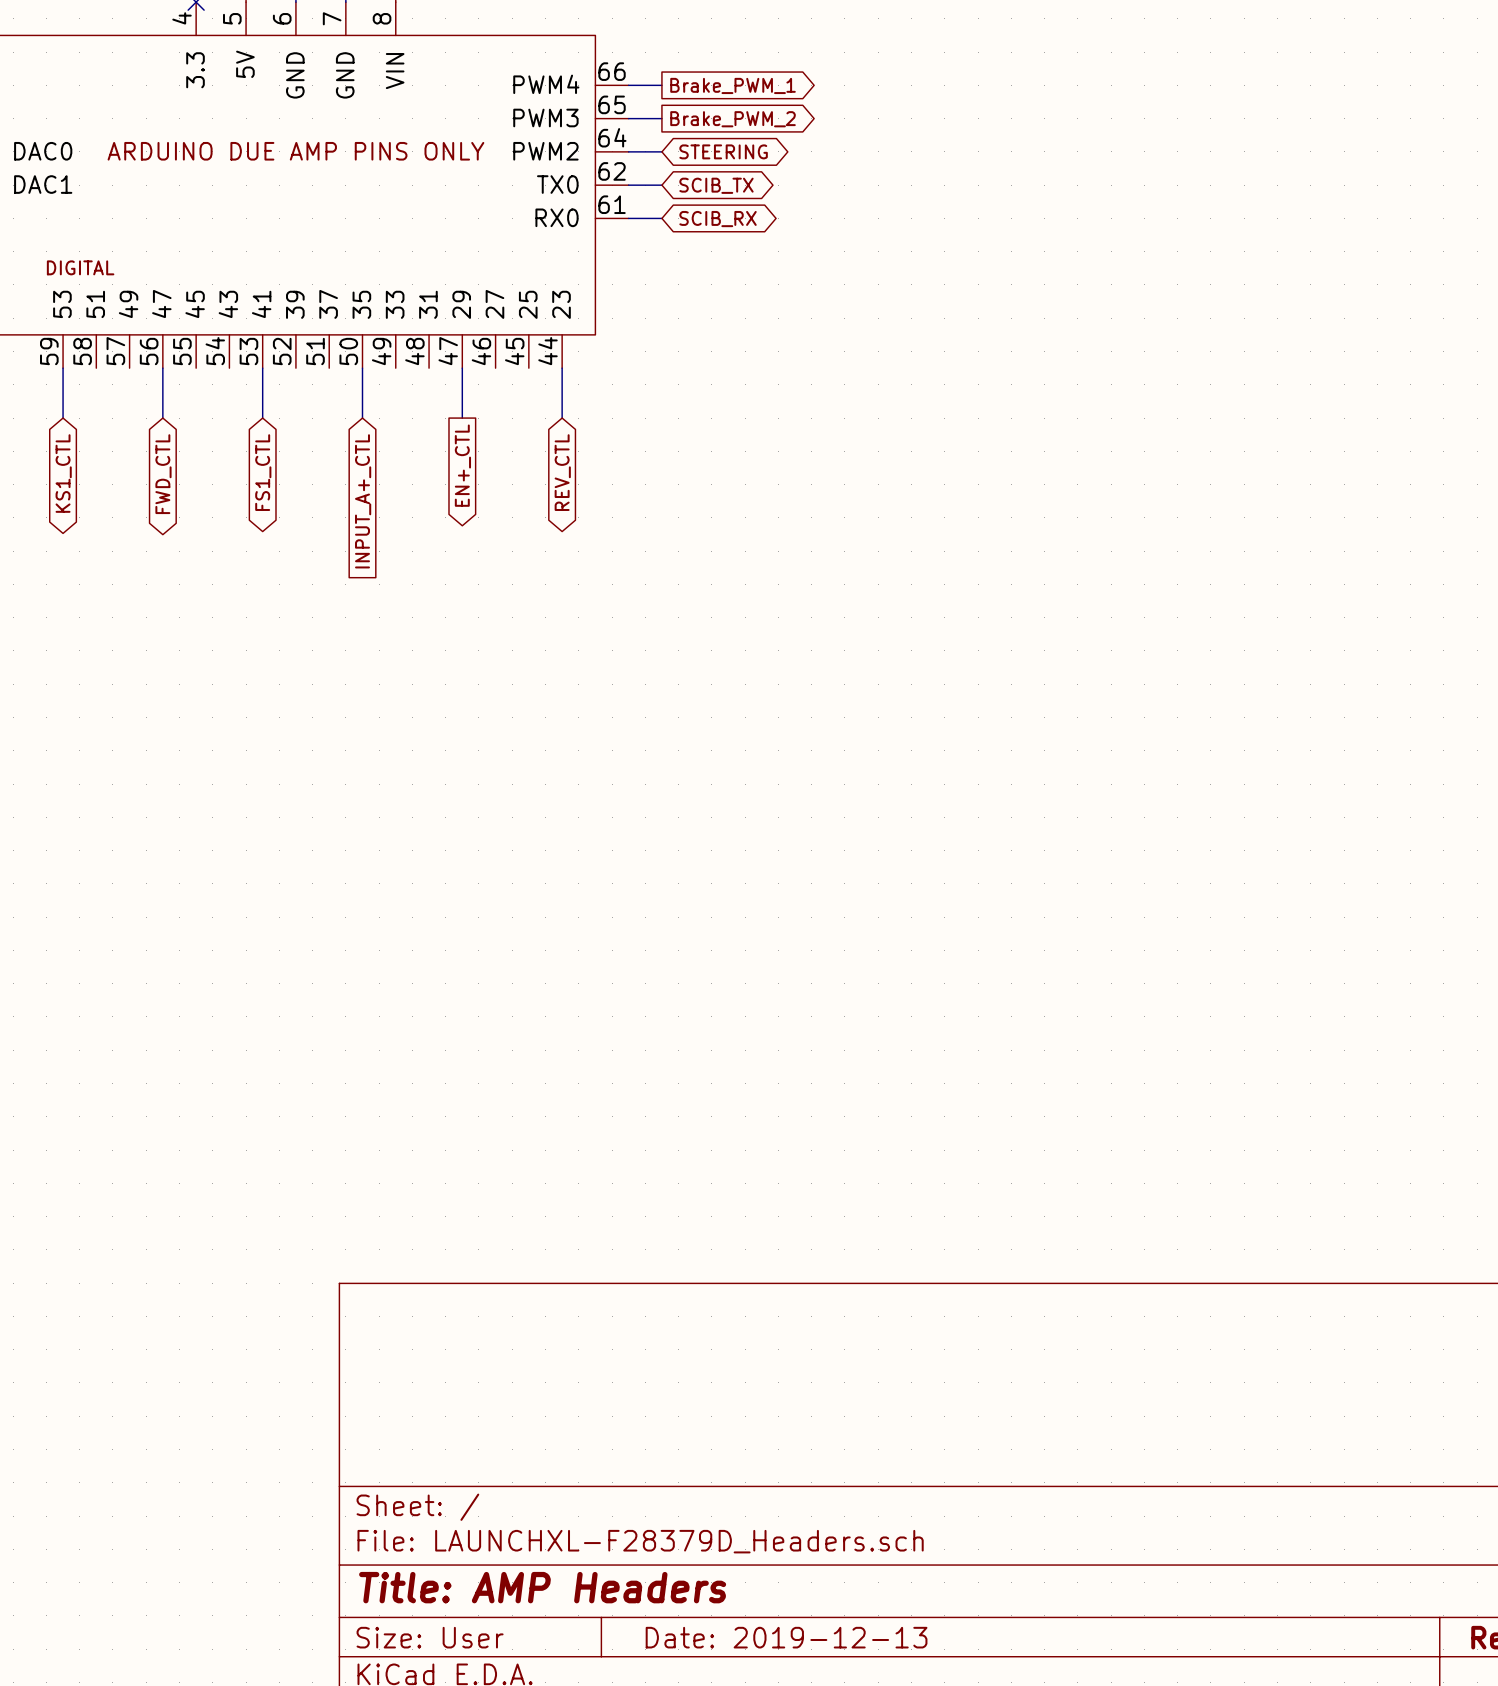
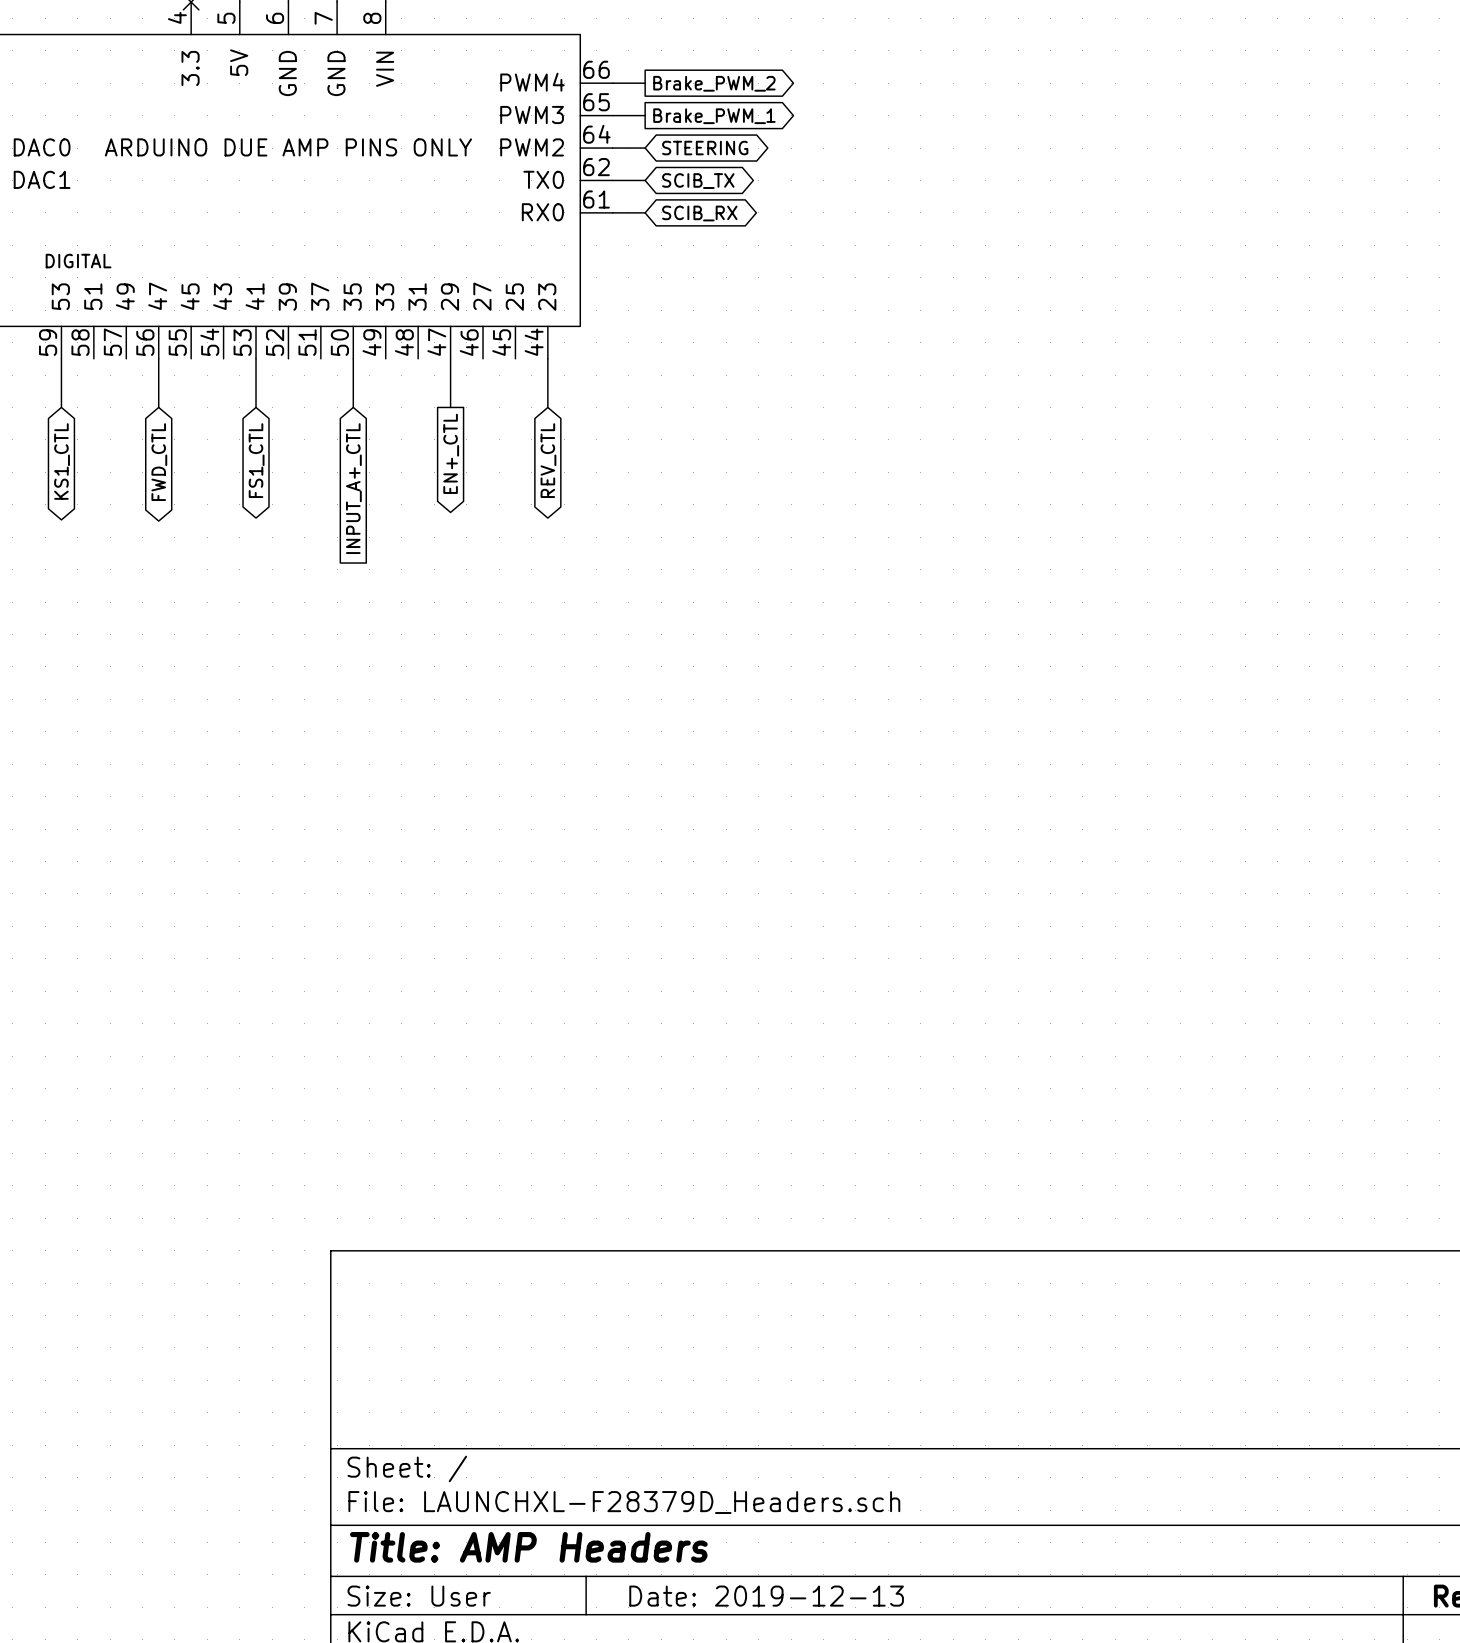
global label: Brake_PWM_1 (733, 85) -> Brake_PWM_2 (714, 83)
global label: Brake_PWM_2 (733, 119) -> Brake_PWM_1 (714, 116)

